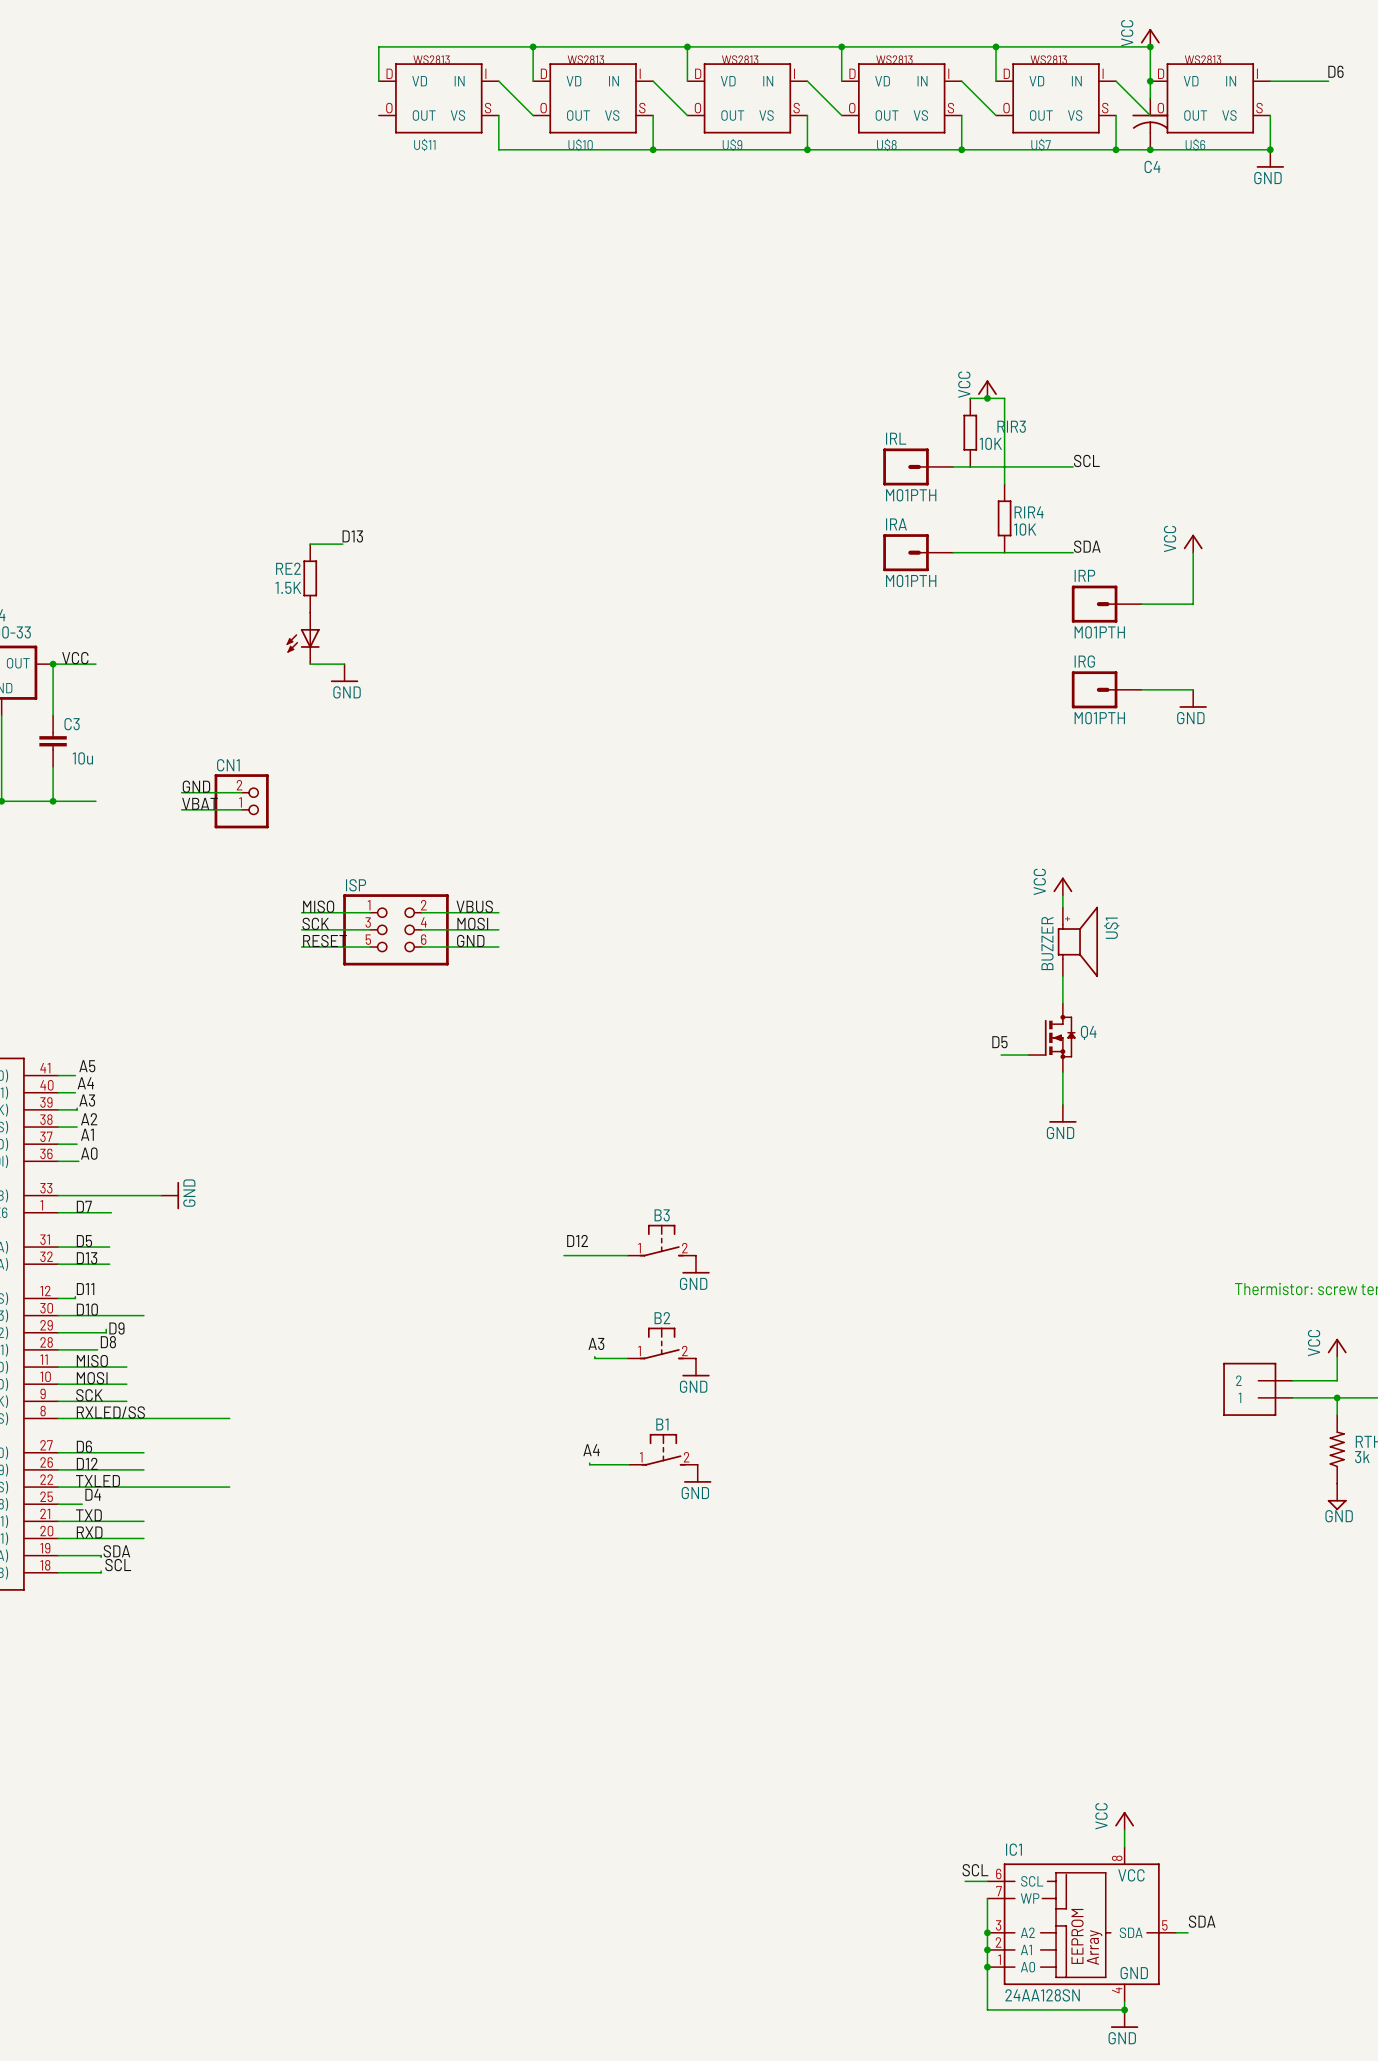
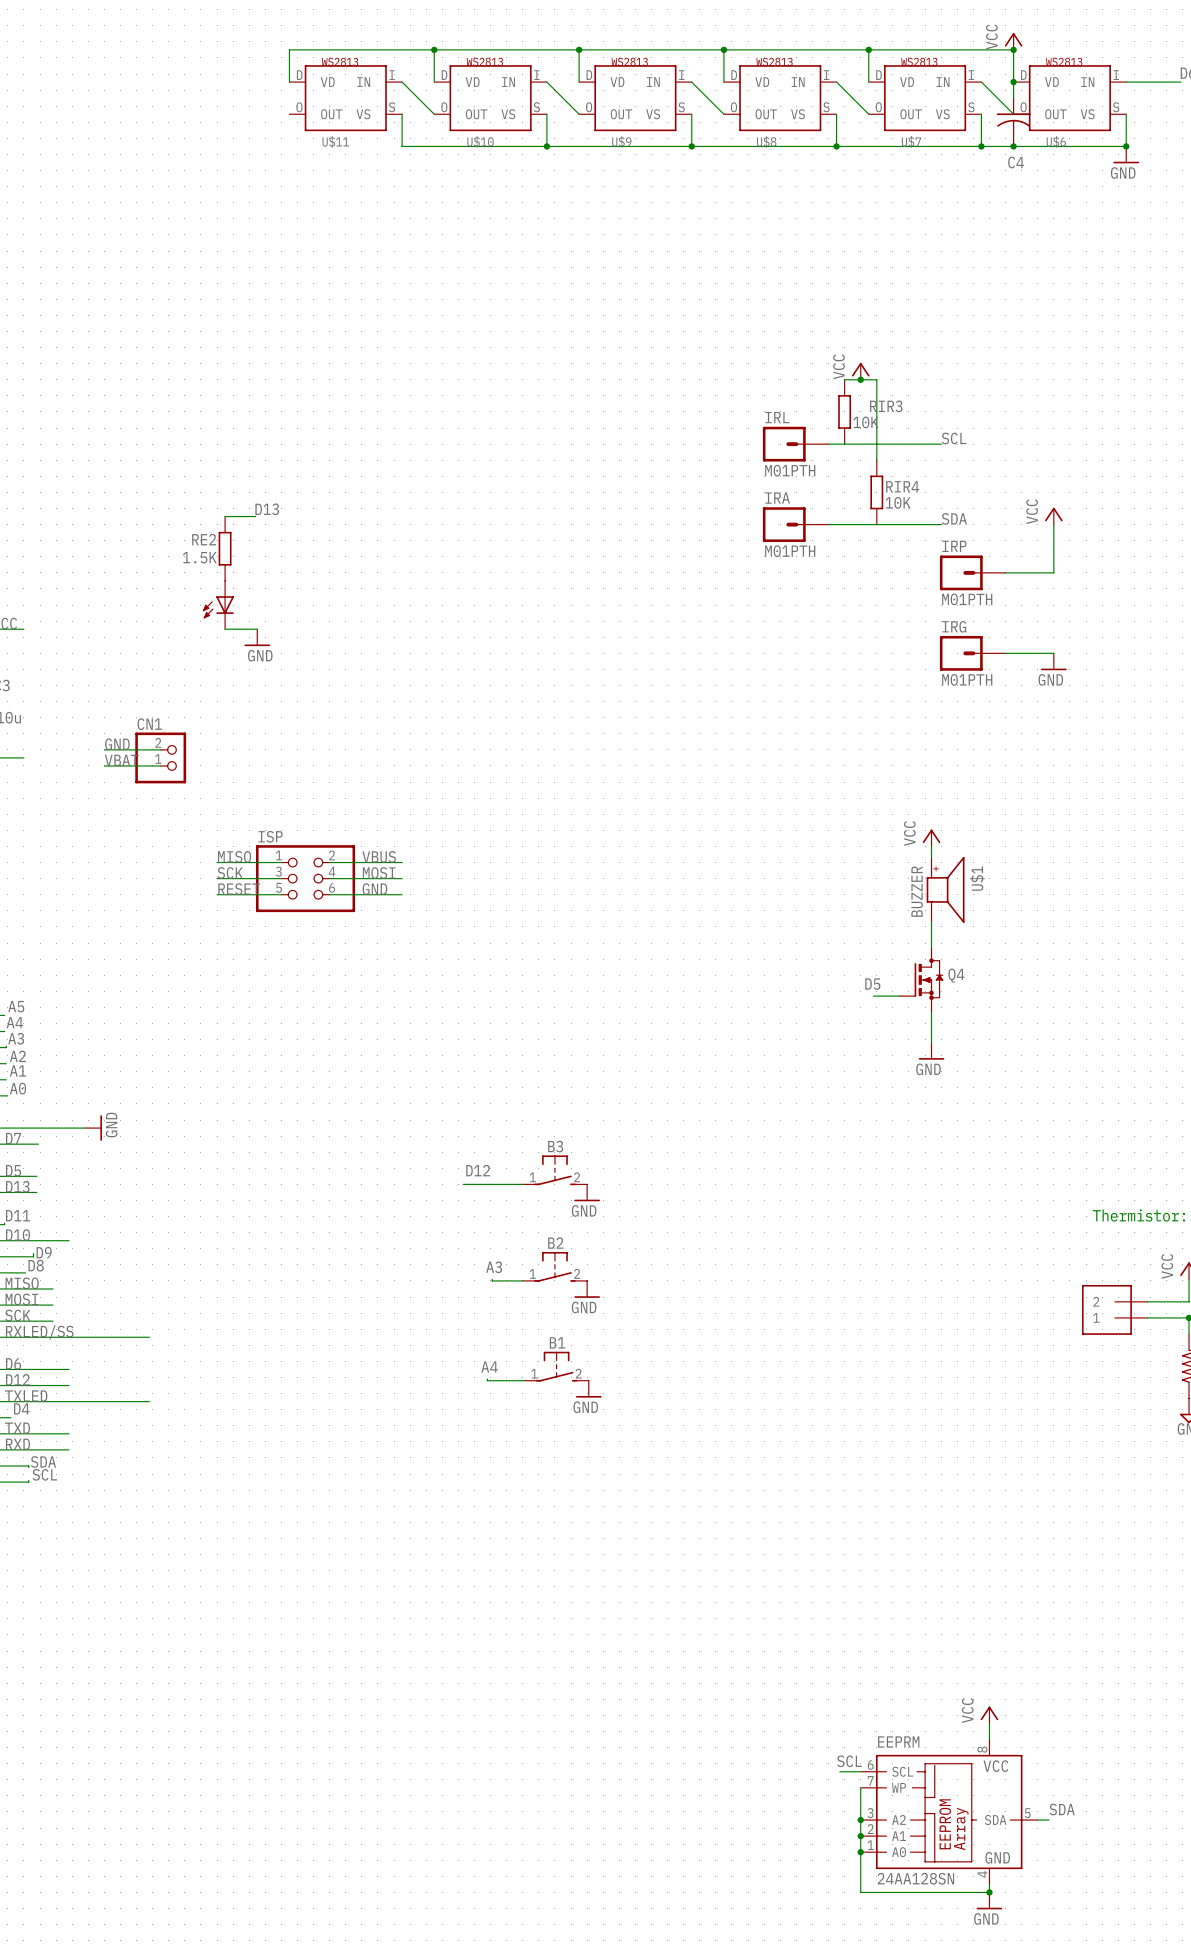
IC1 name: IC1 (1013, 1849) -> EEPRM (898, 1741)

